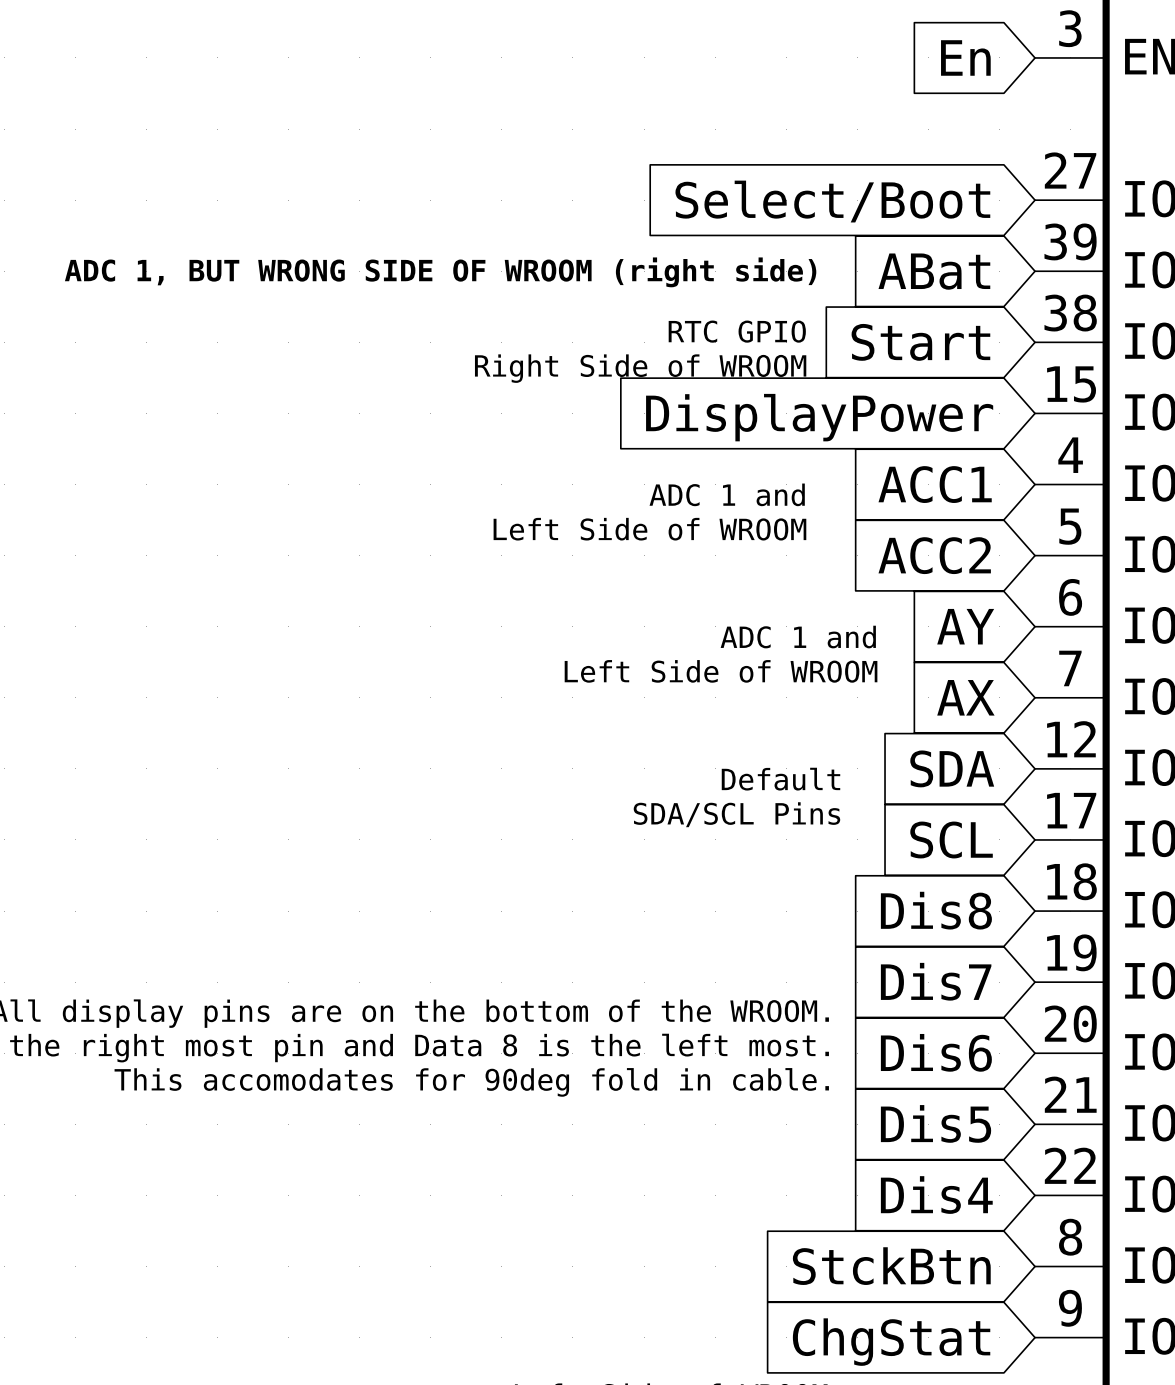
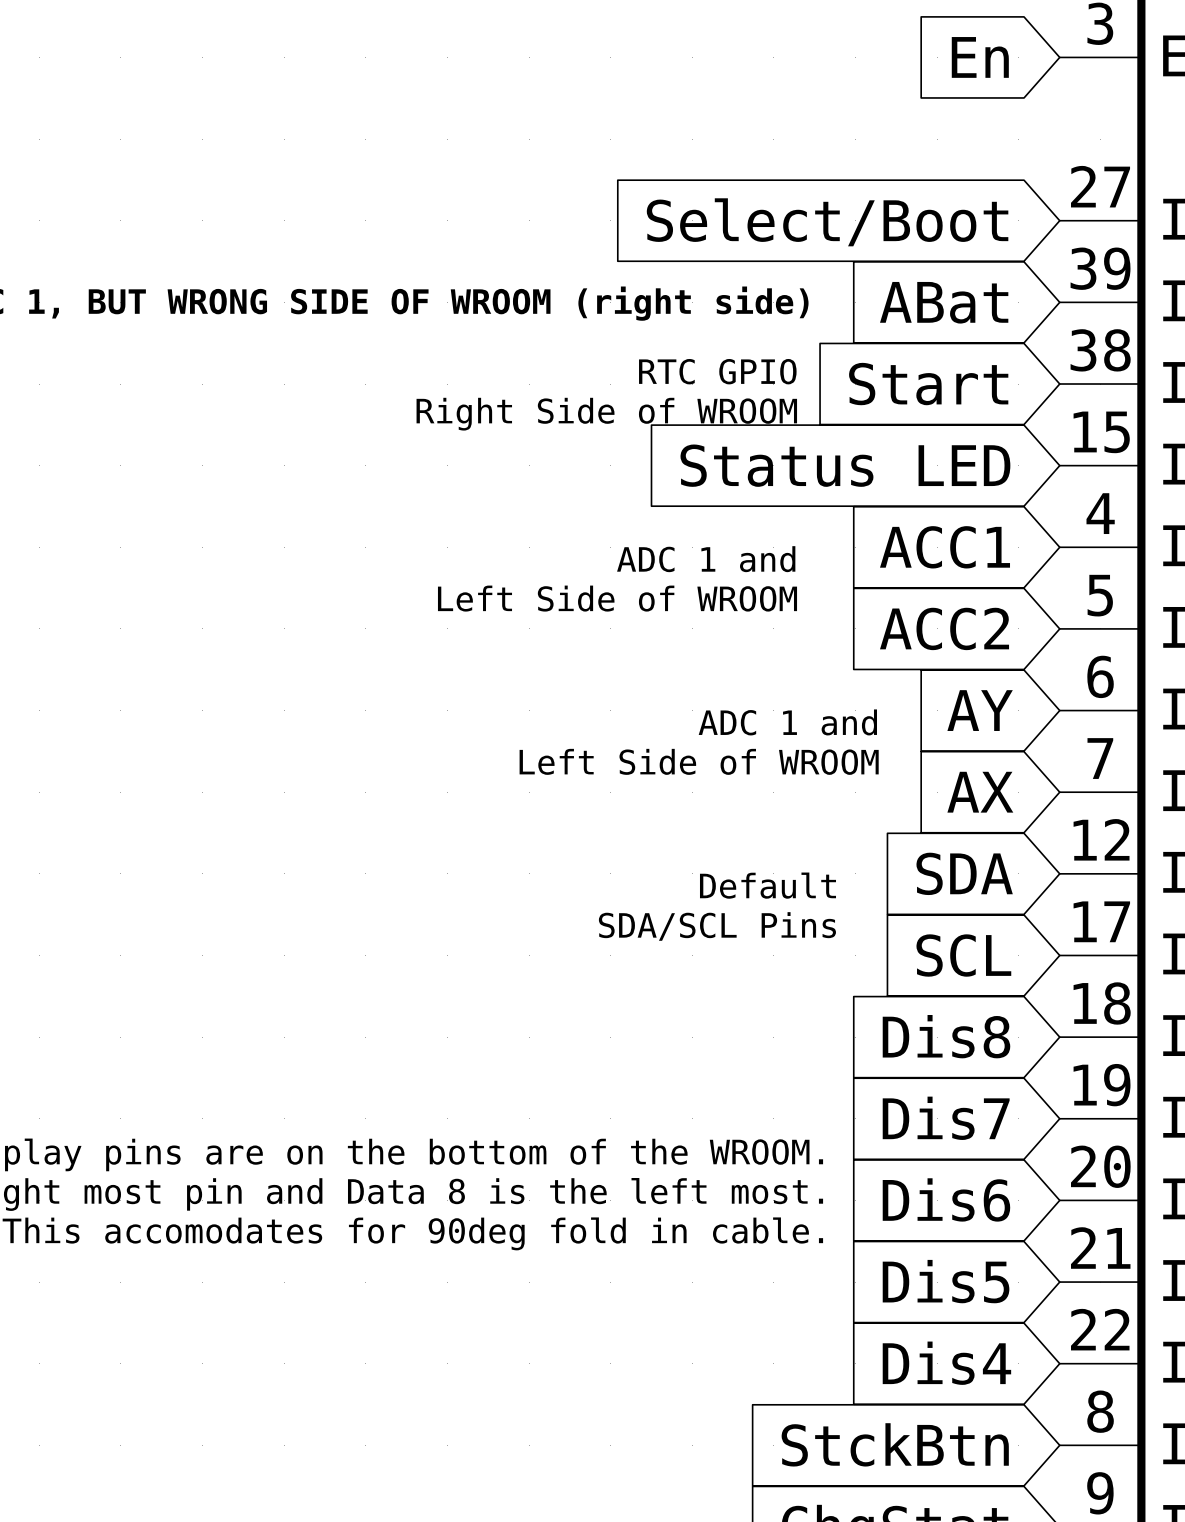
global label: DisplayPower (819, 417) -> Status LED (845, 465)

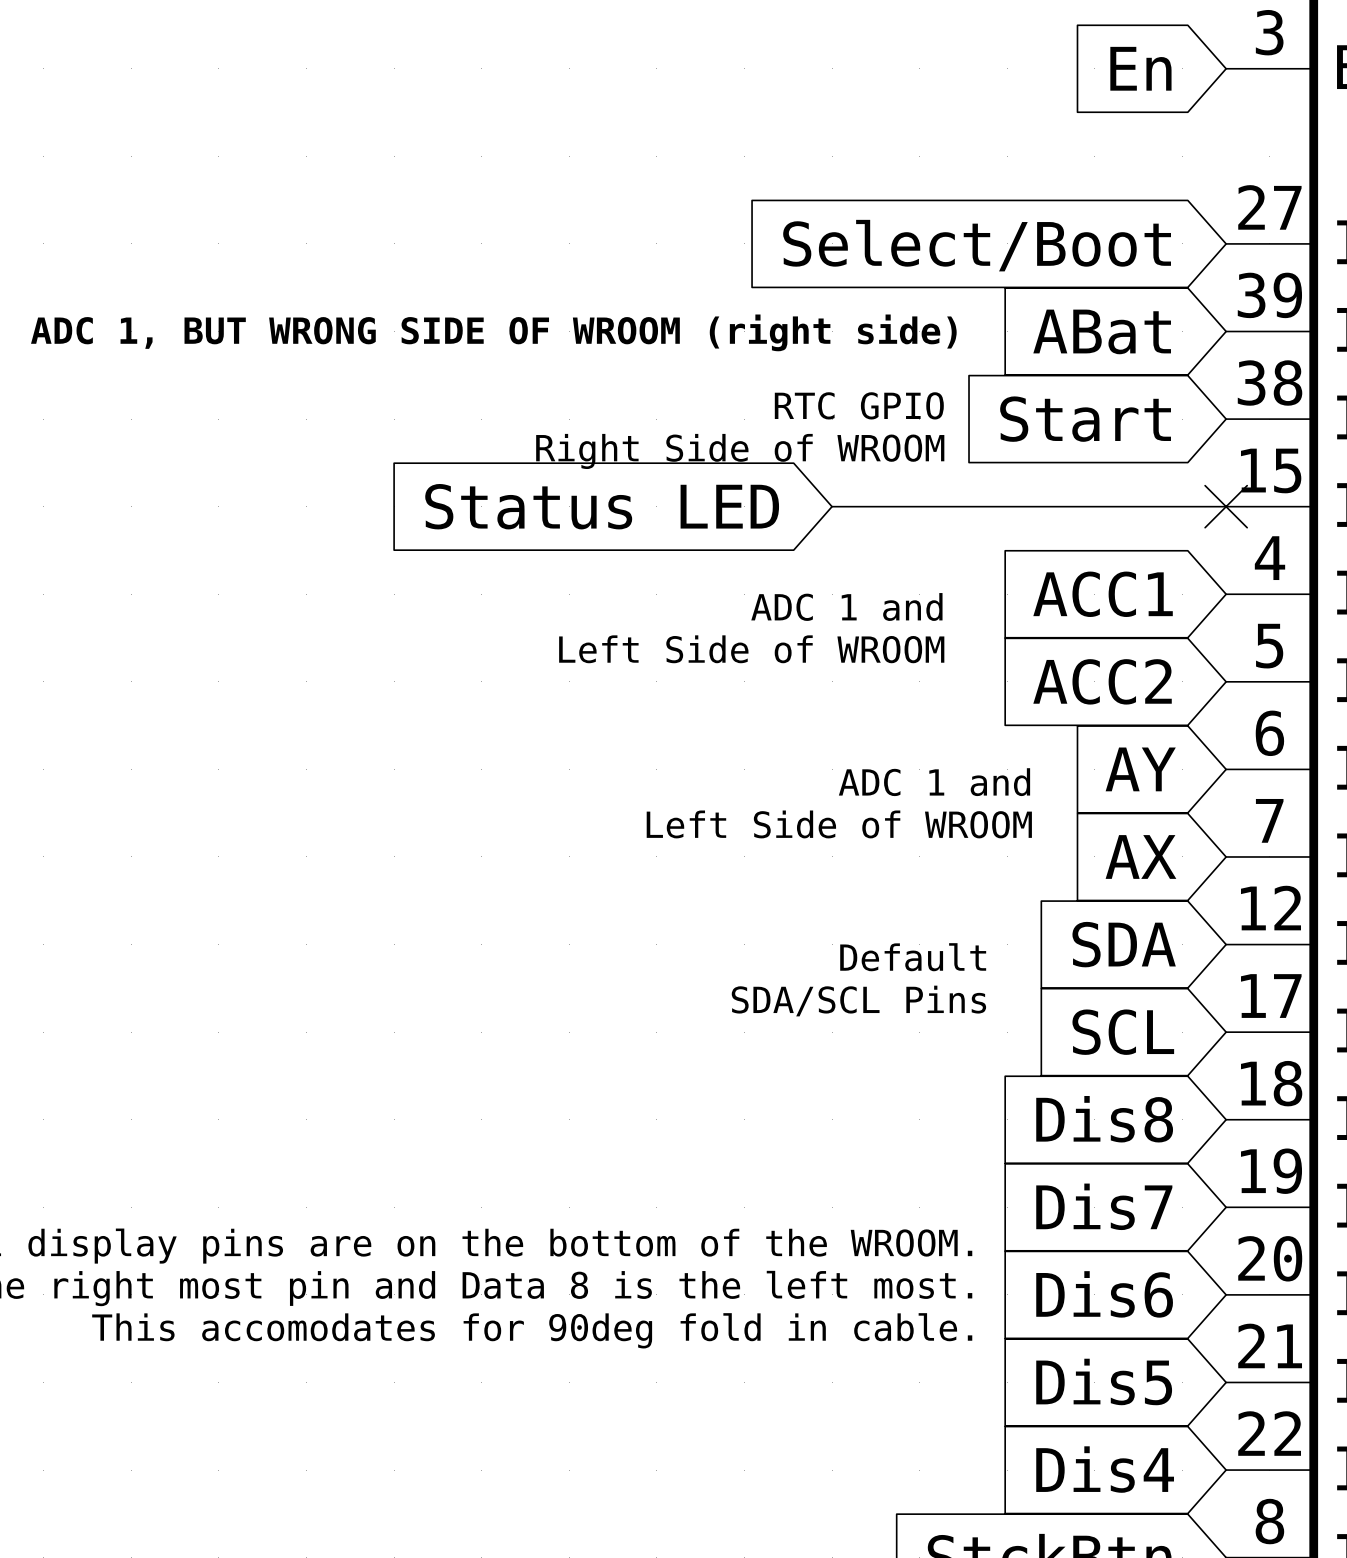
wire: none -> (832, 506) (1226, 506)
global label position: Status LED (845, 465) -> Status LED (602, 506)
no-connect mark: none -> (1226, 506)

